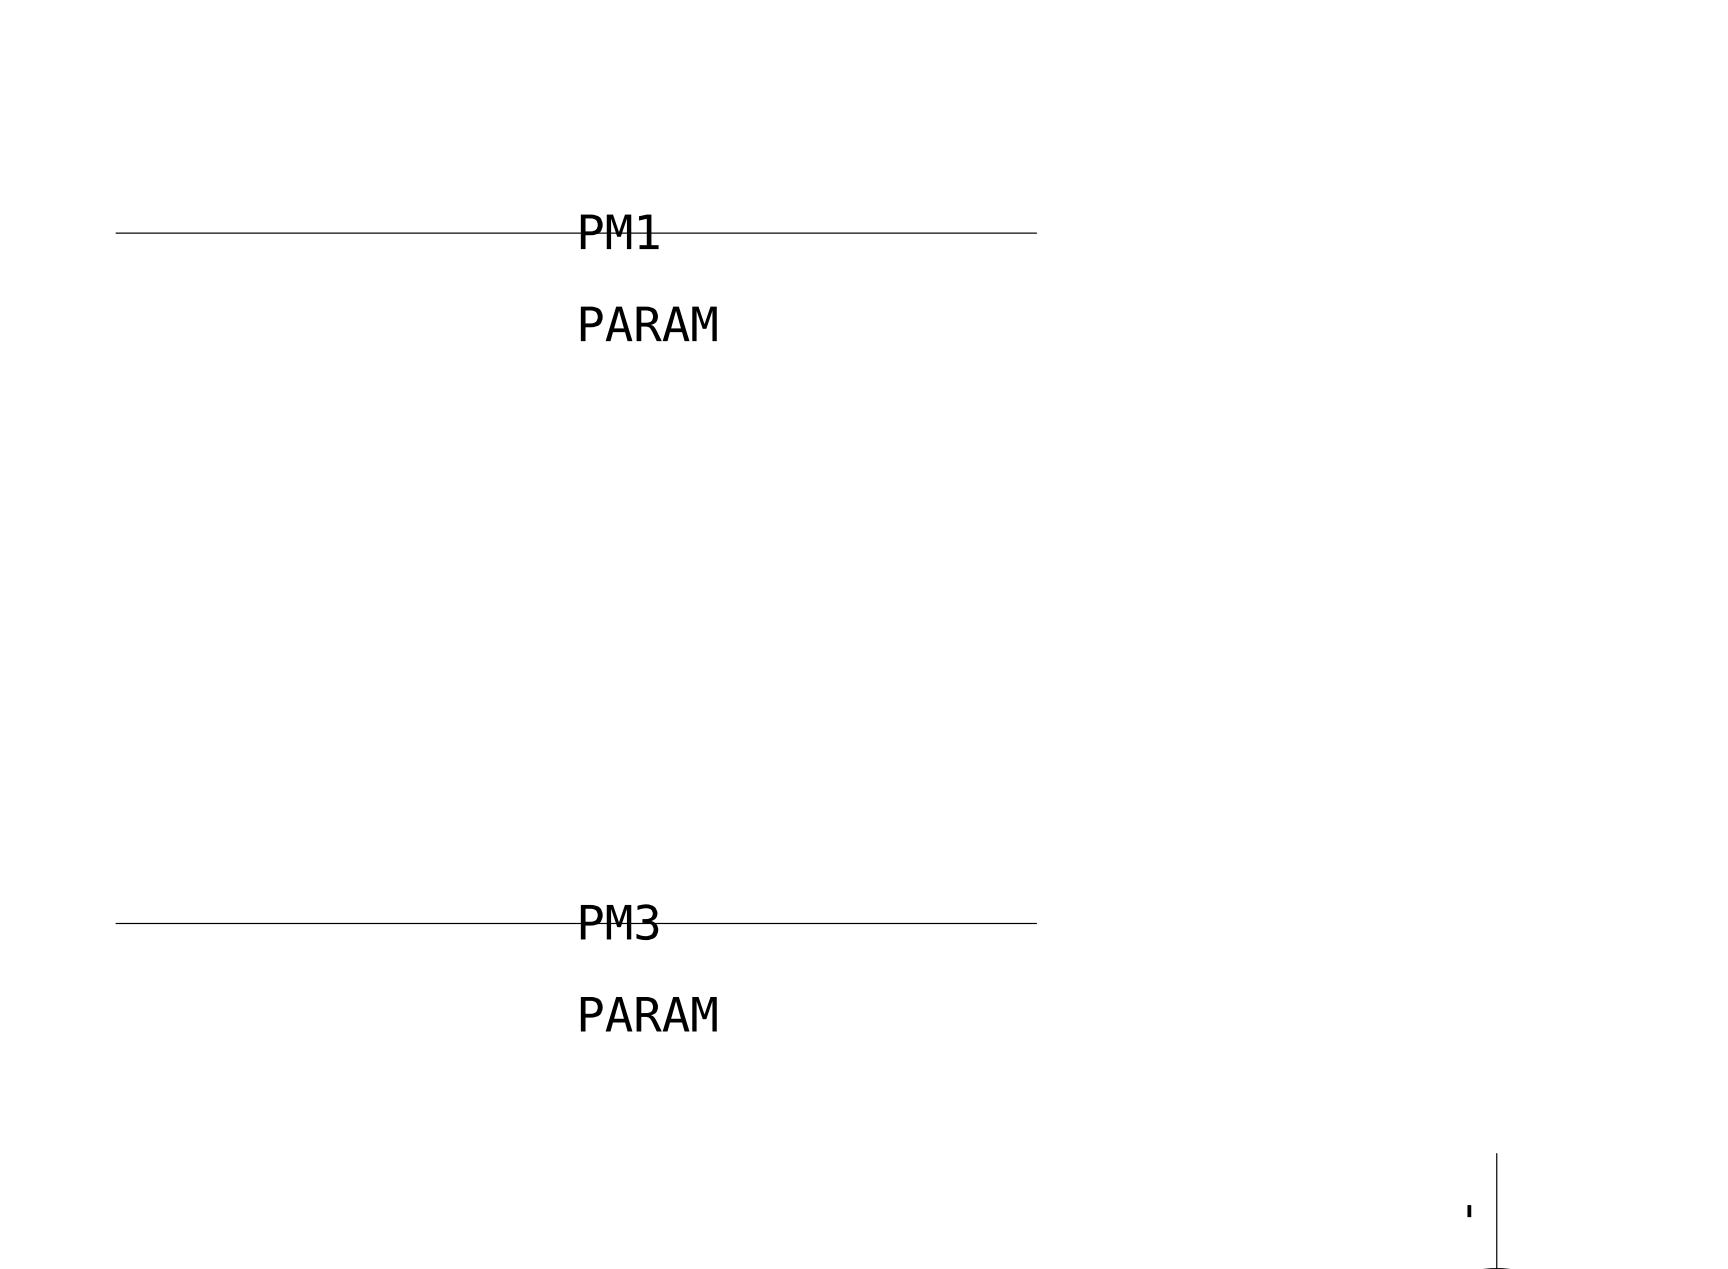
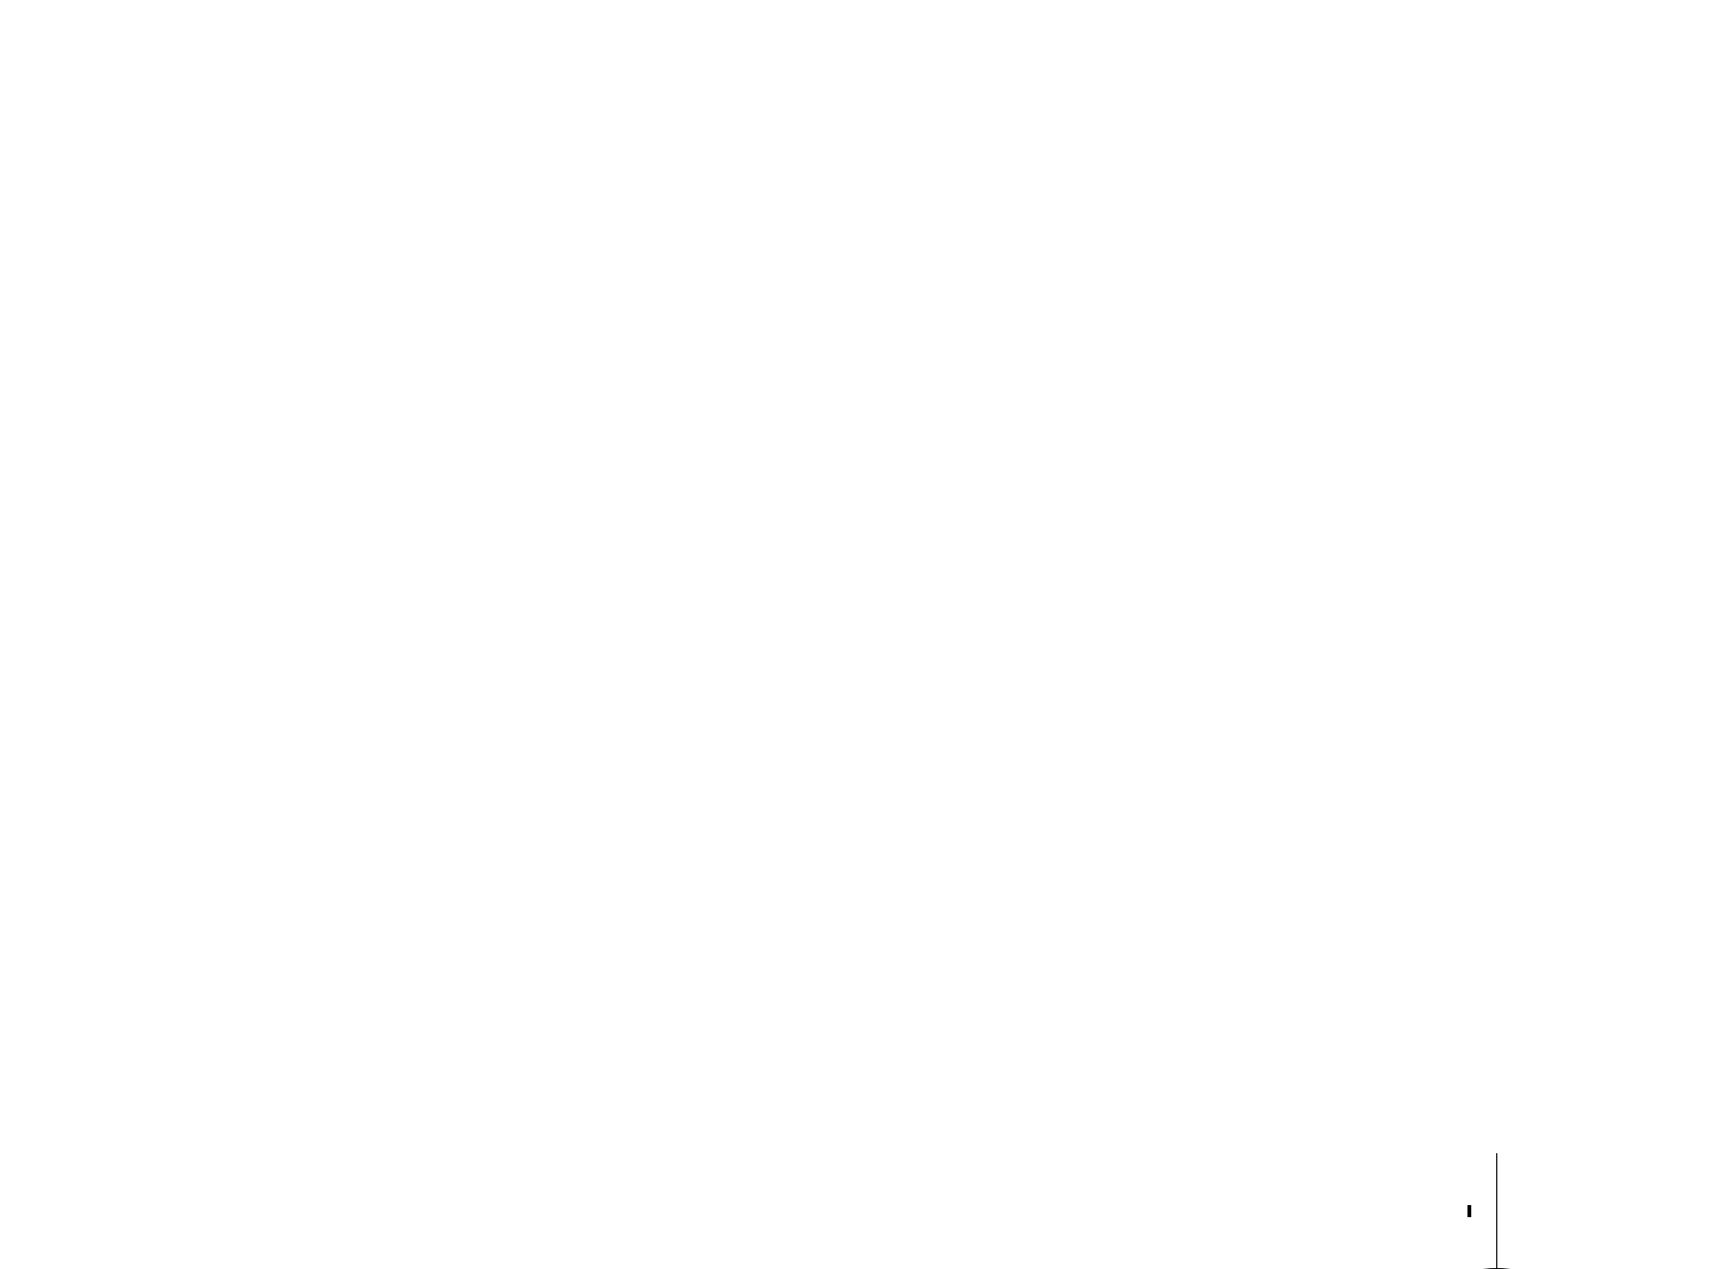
PM1: PARAM (576, 233) -> none
PM3: PARAM (576, 923) -> none

